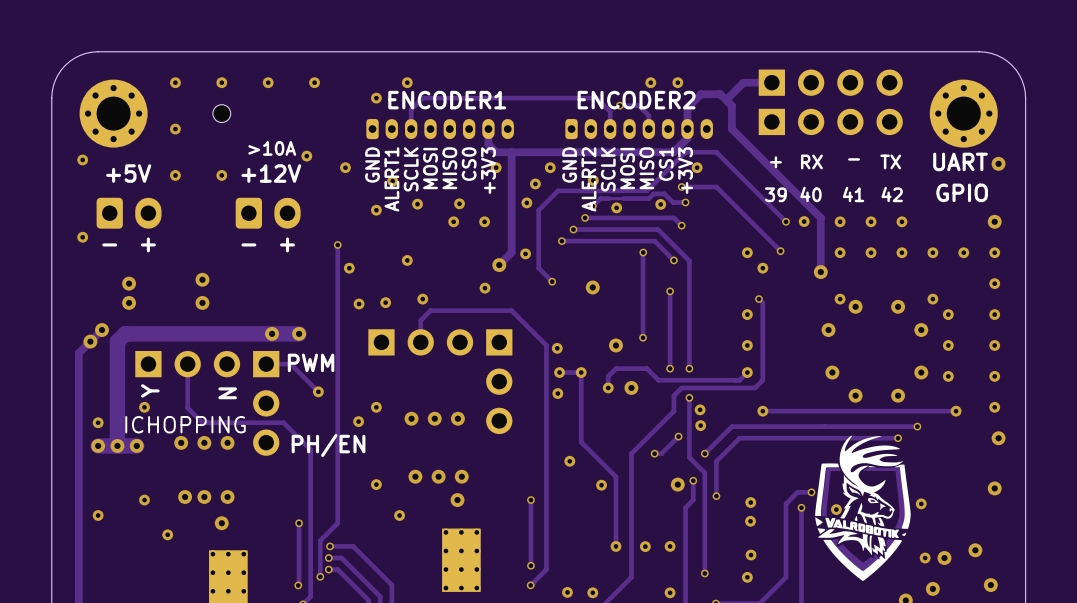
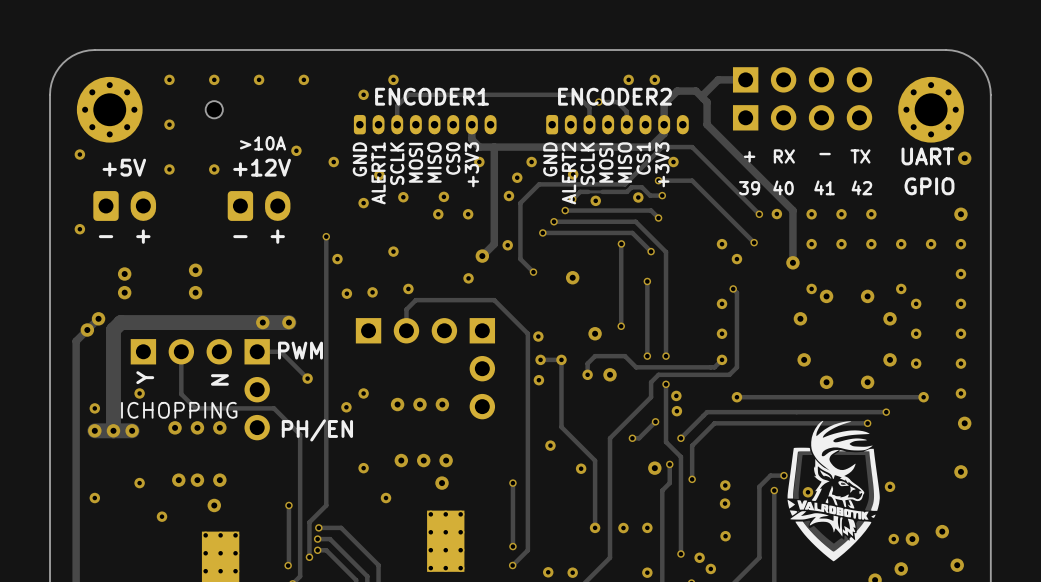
via: none -> (699, 557)
via: (747, 577) -> none
via: none -> (710, 568)

